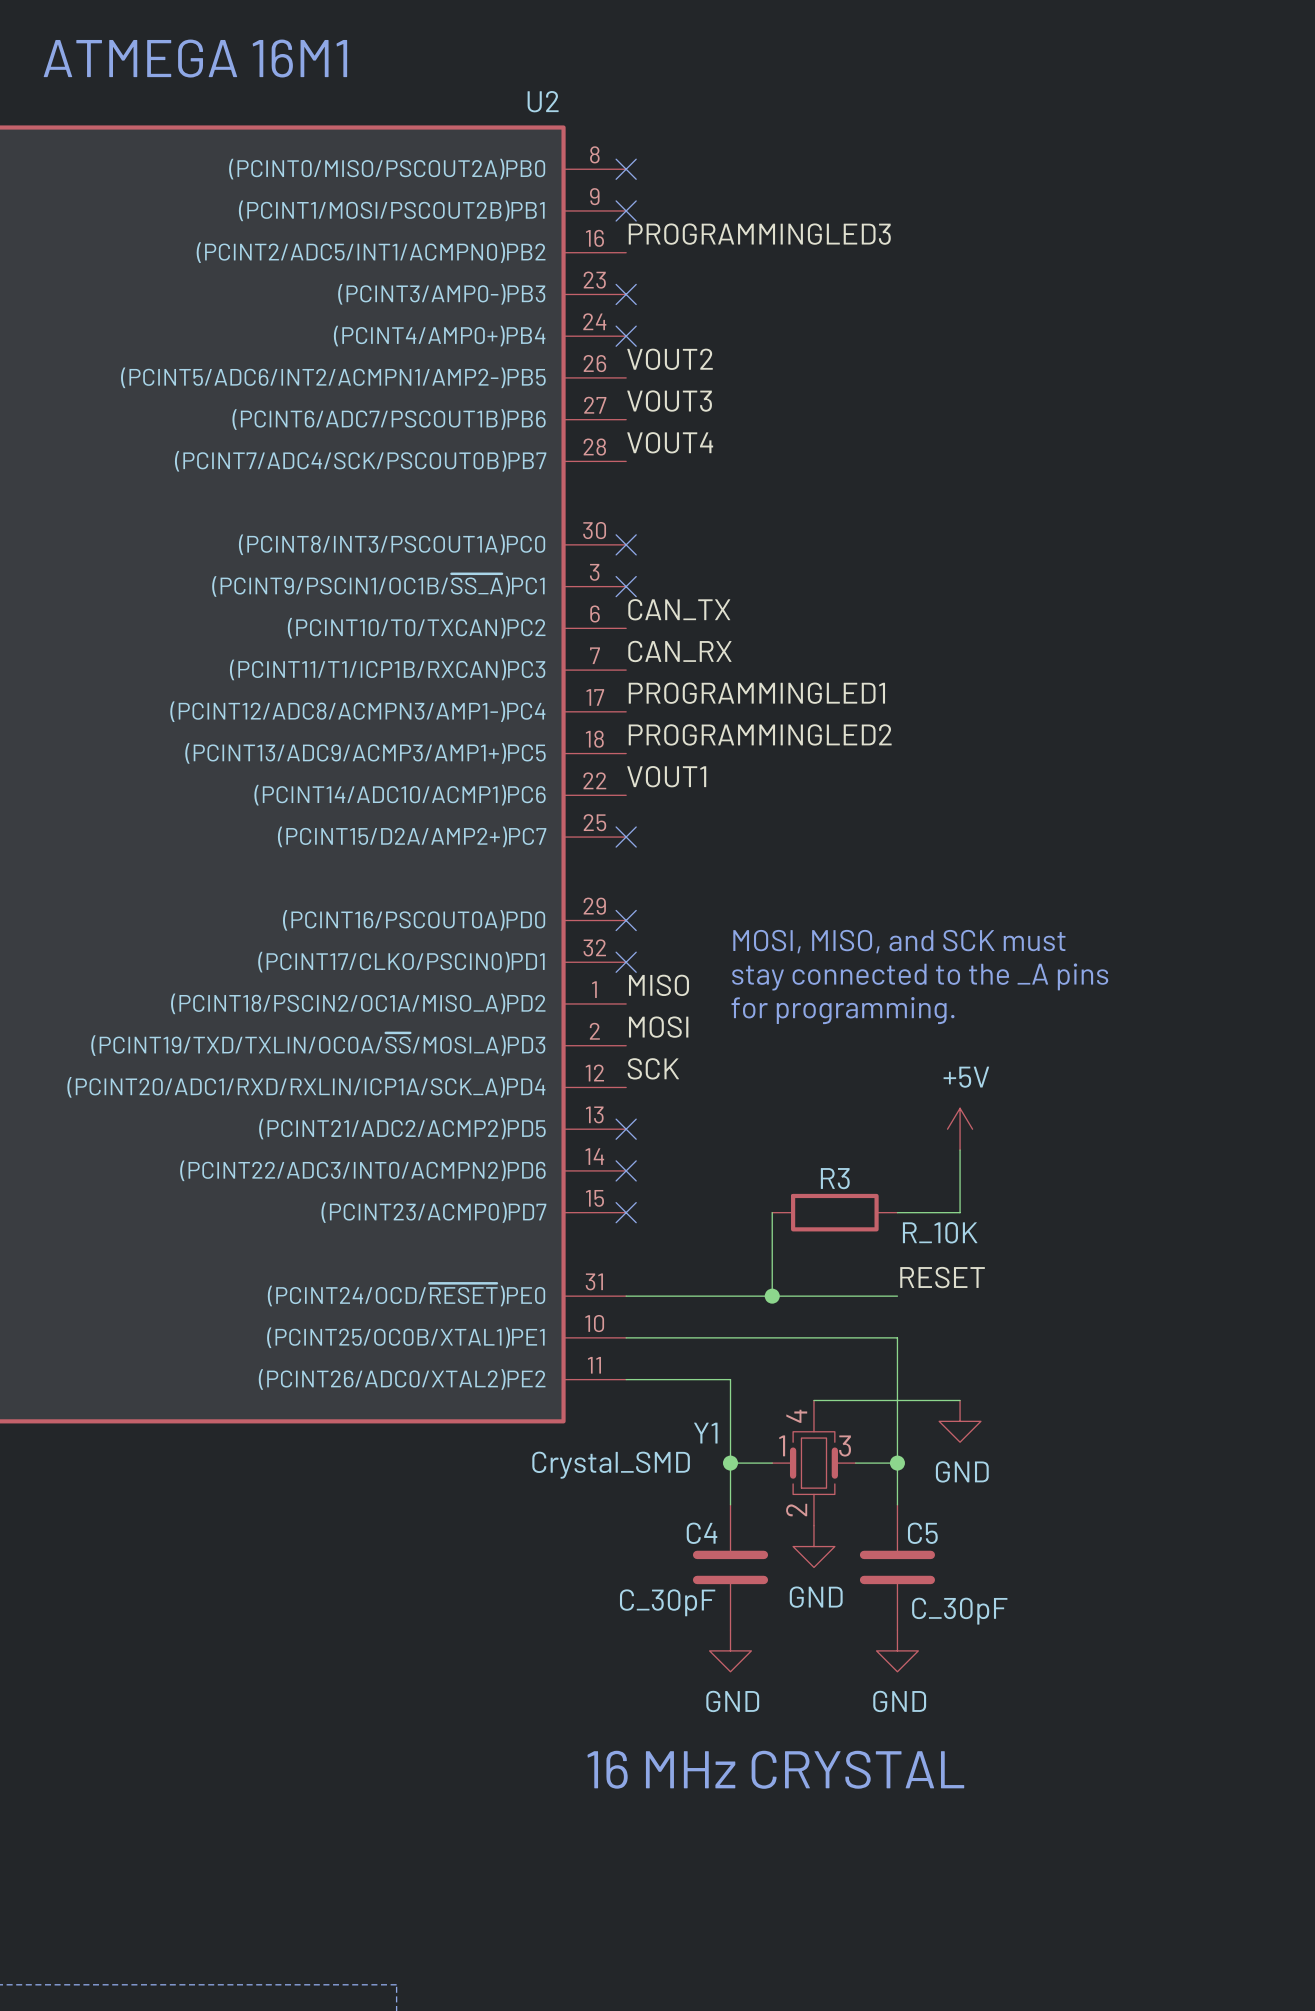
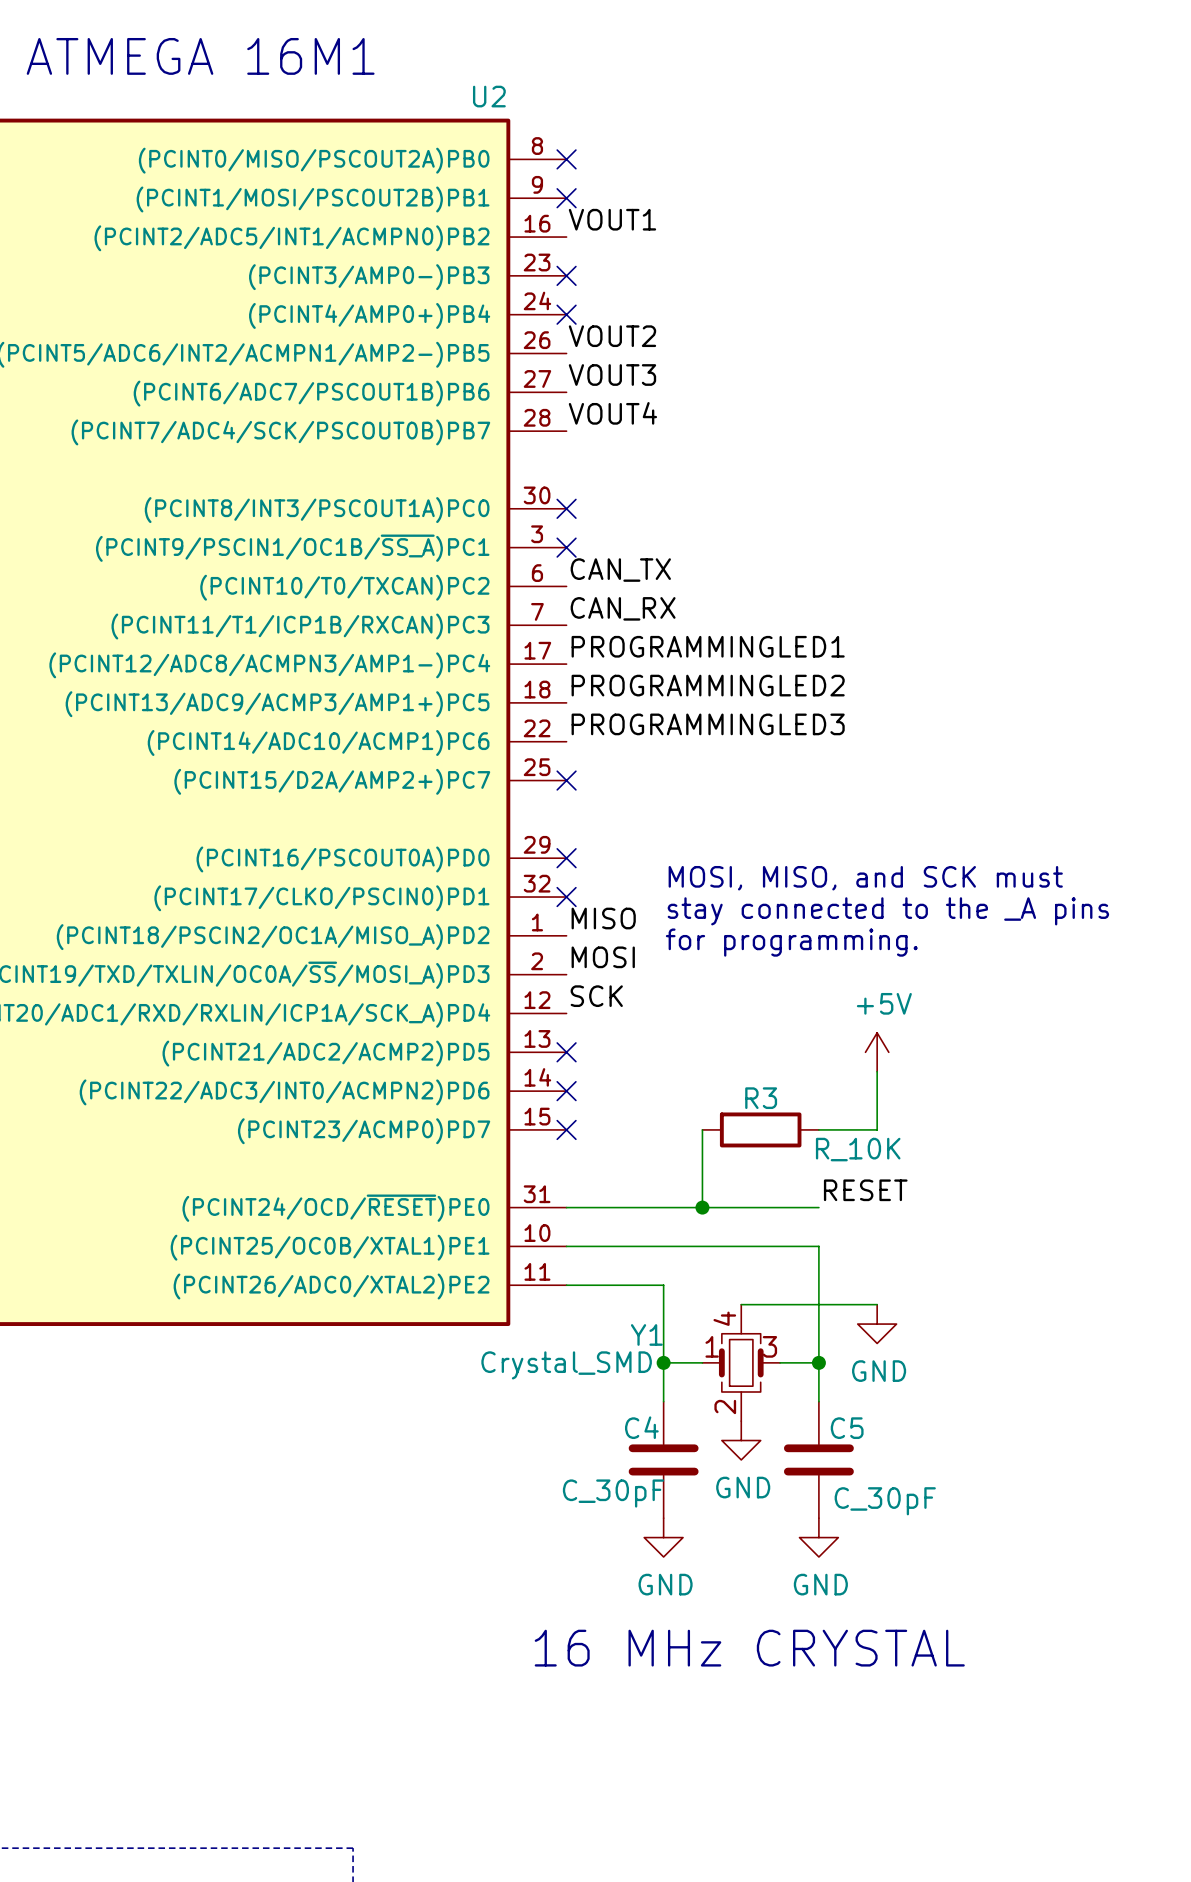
label: PROGRAMMINGLED3 (759, 234) -> VOUT1 (612, 219)
label: VOUT1 (666, 776) -> PROGRAMMINGLED3 (708, 724)

